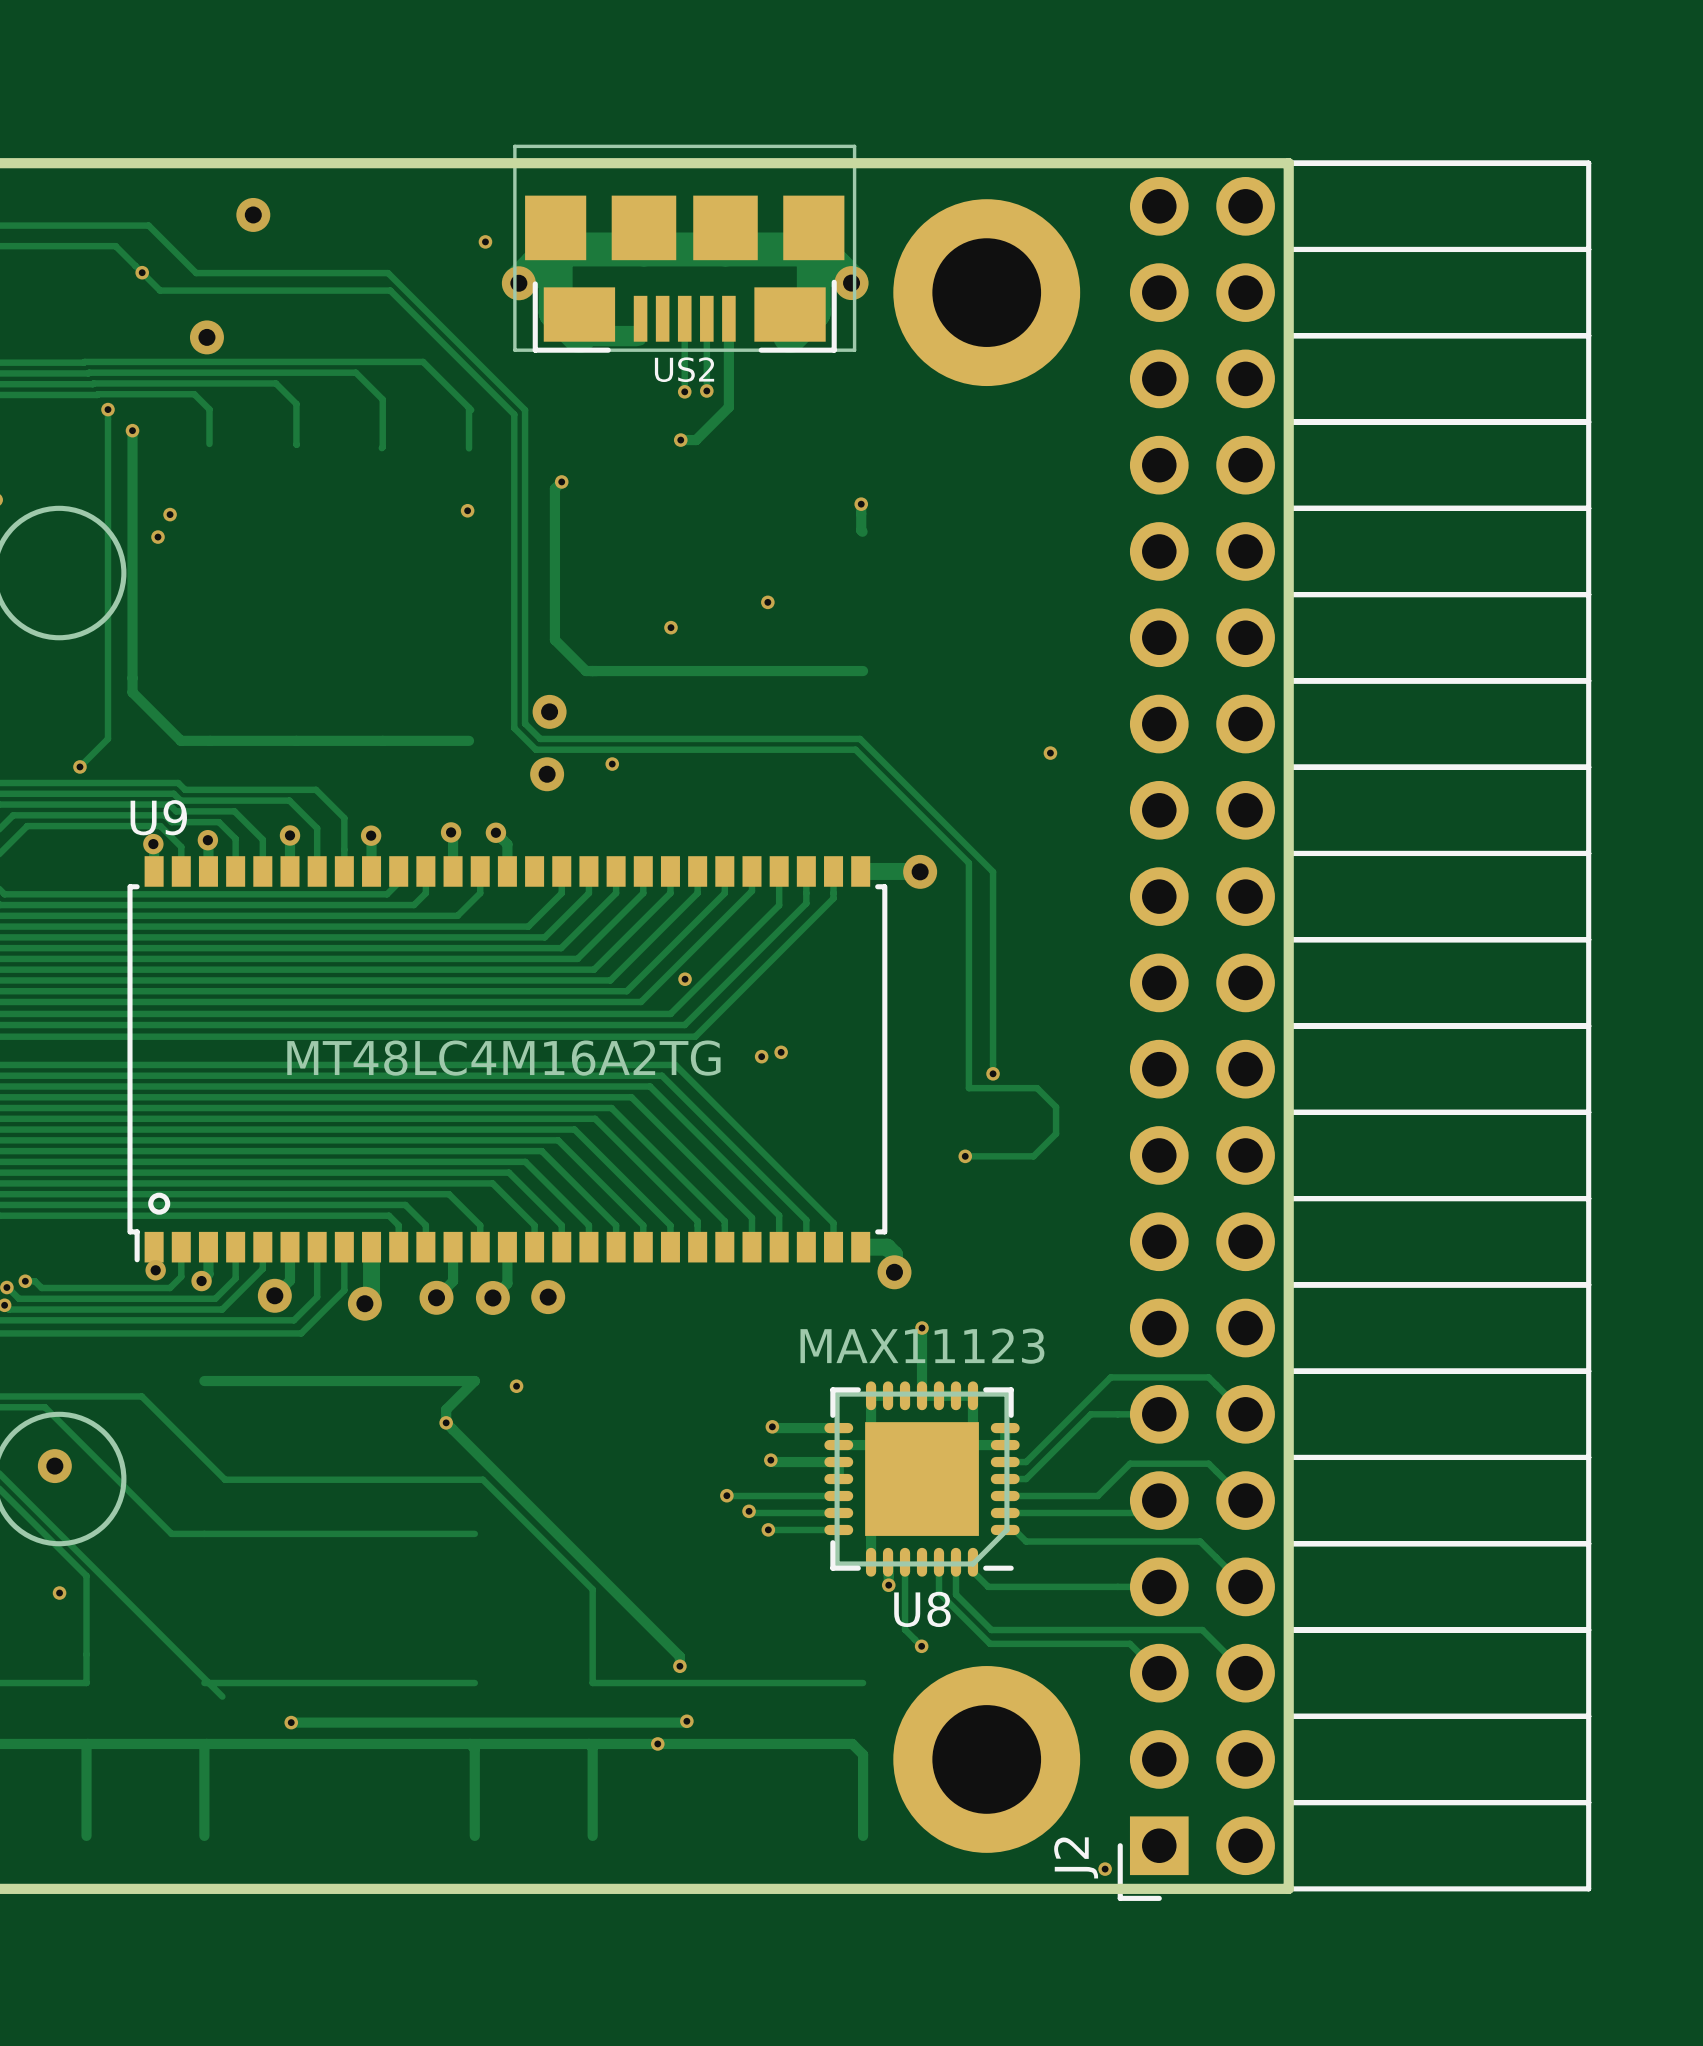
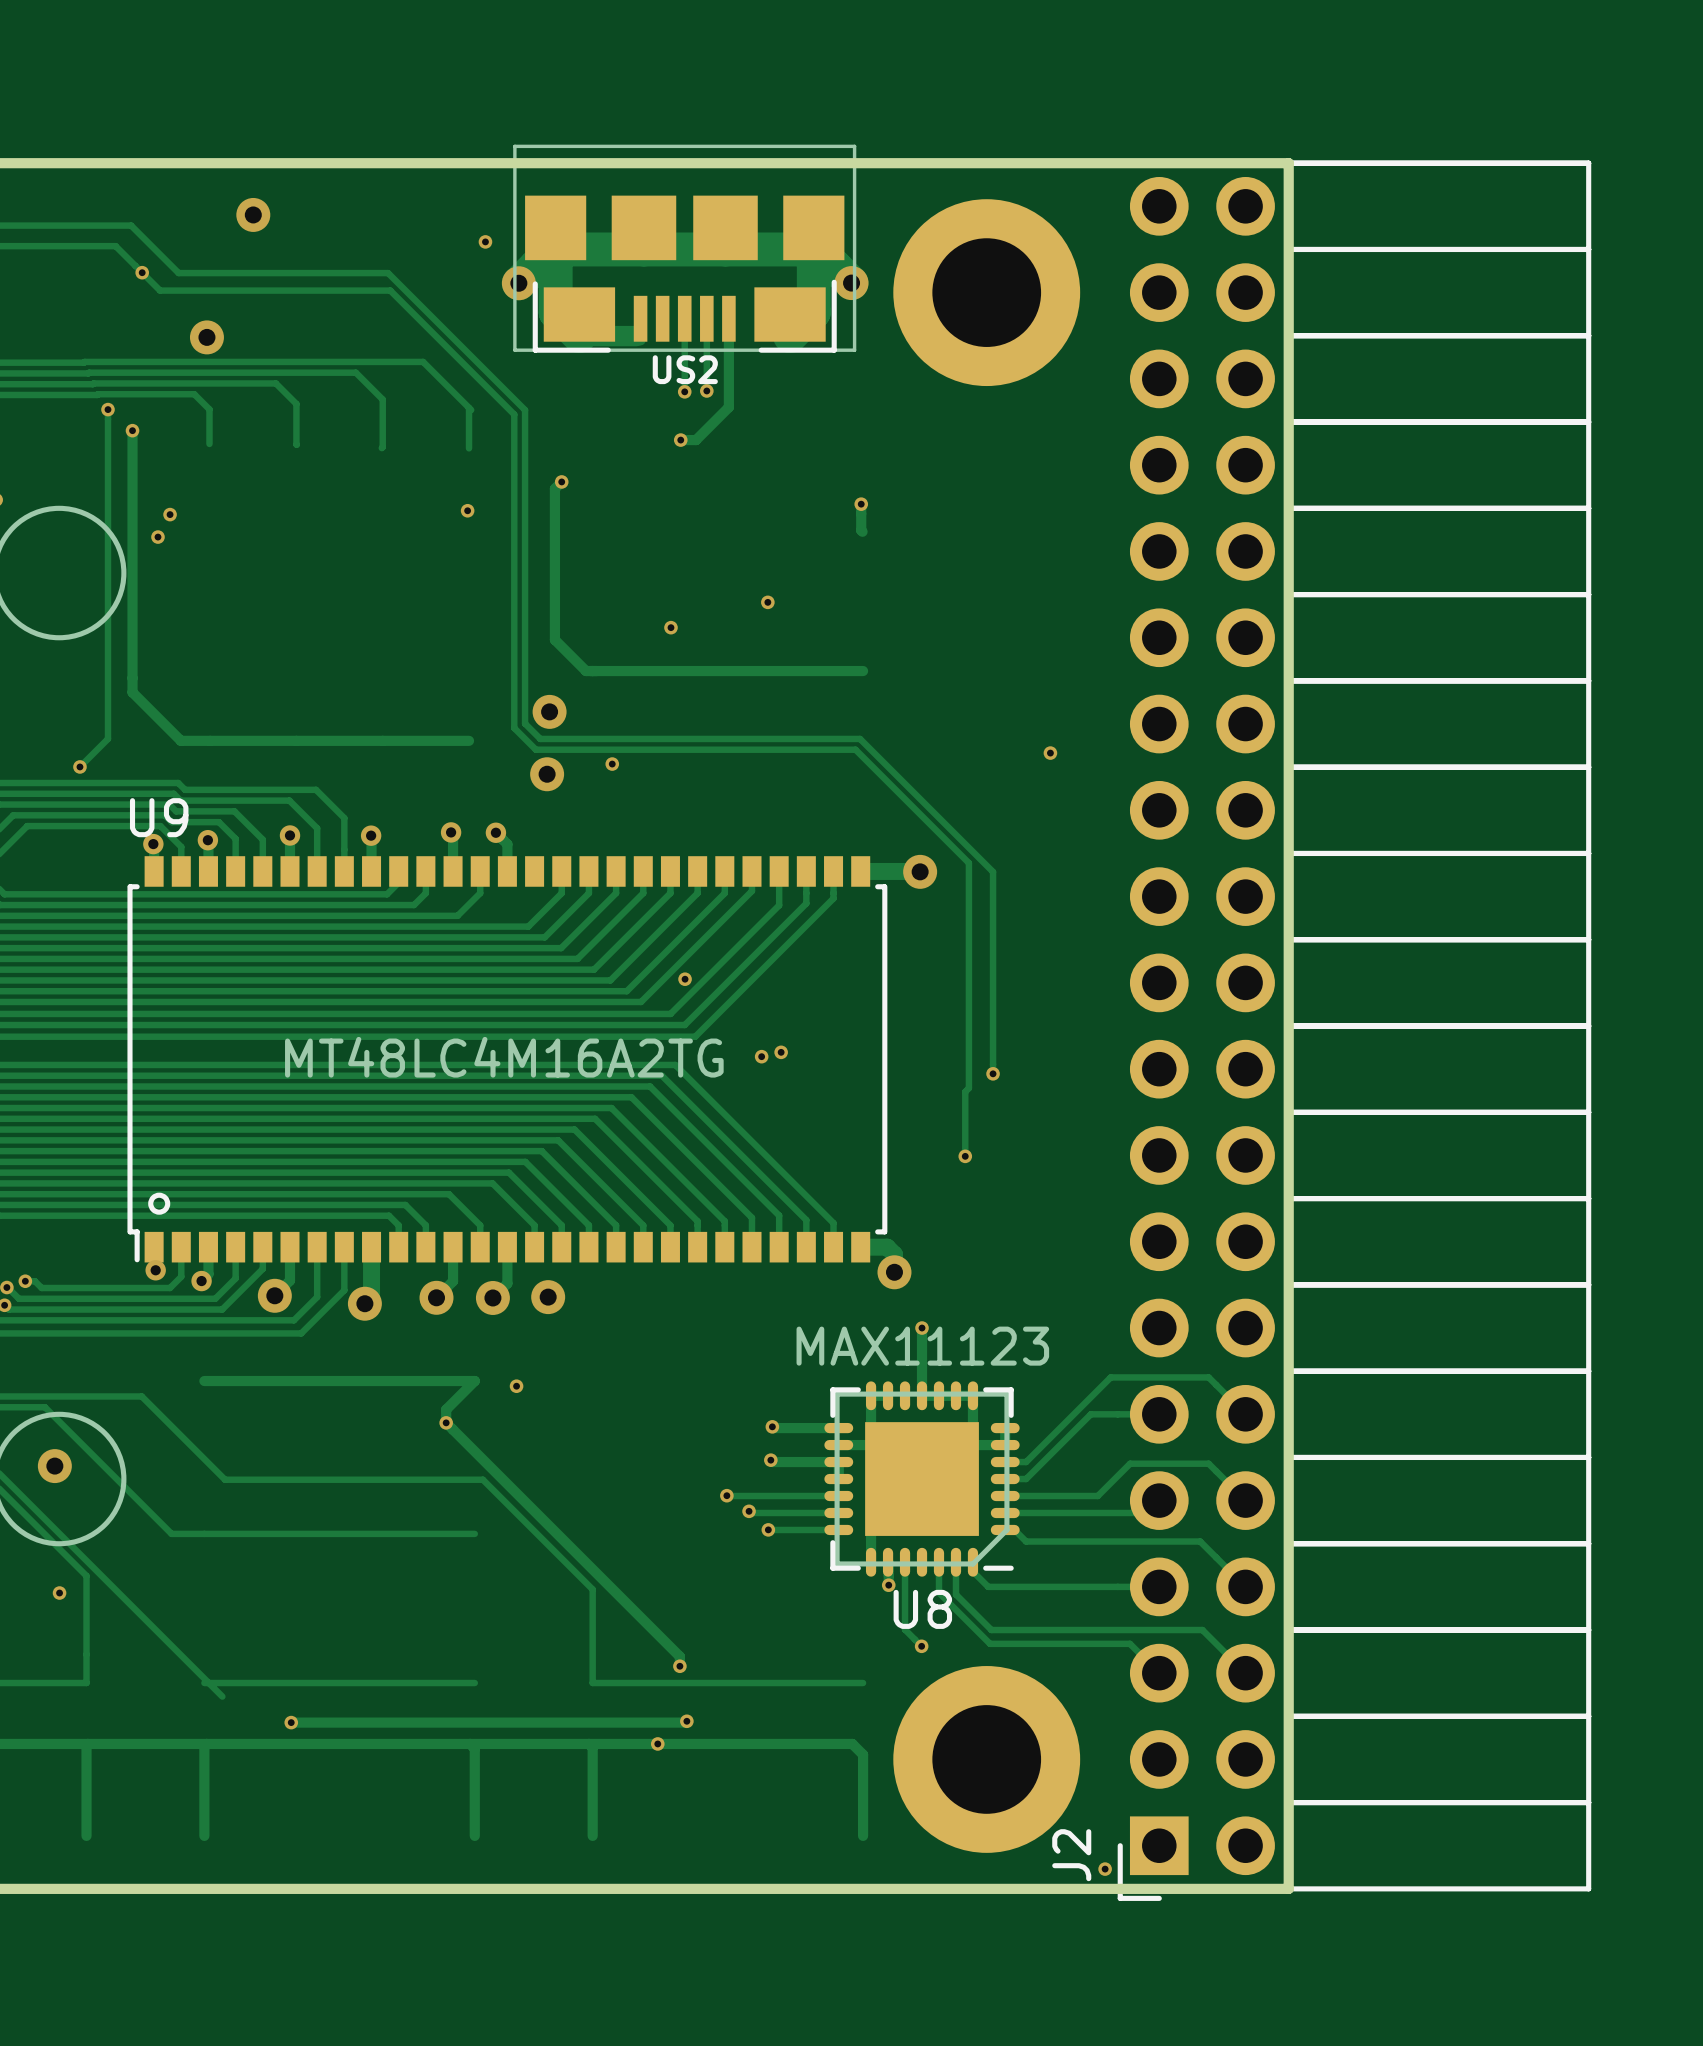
track: (131, 225) (148, 225) (196, 273) -> (131, 225) (178, 273) (196, 273)
track: (968, 1088) (1037, 1088) (1056, 1107) (1056, 1133) (1033, 1156) (965, 1156) -> (968, 1088) (965, 1091) (965, 1156)

